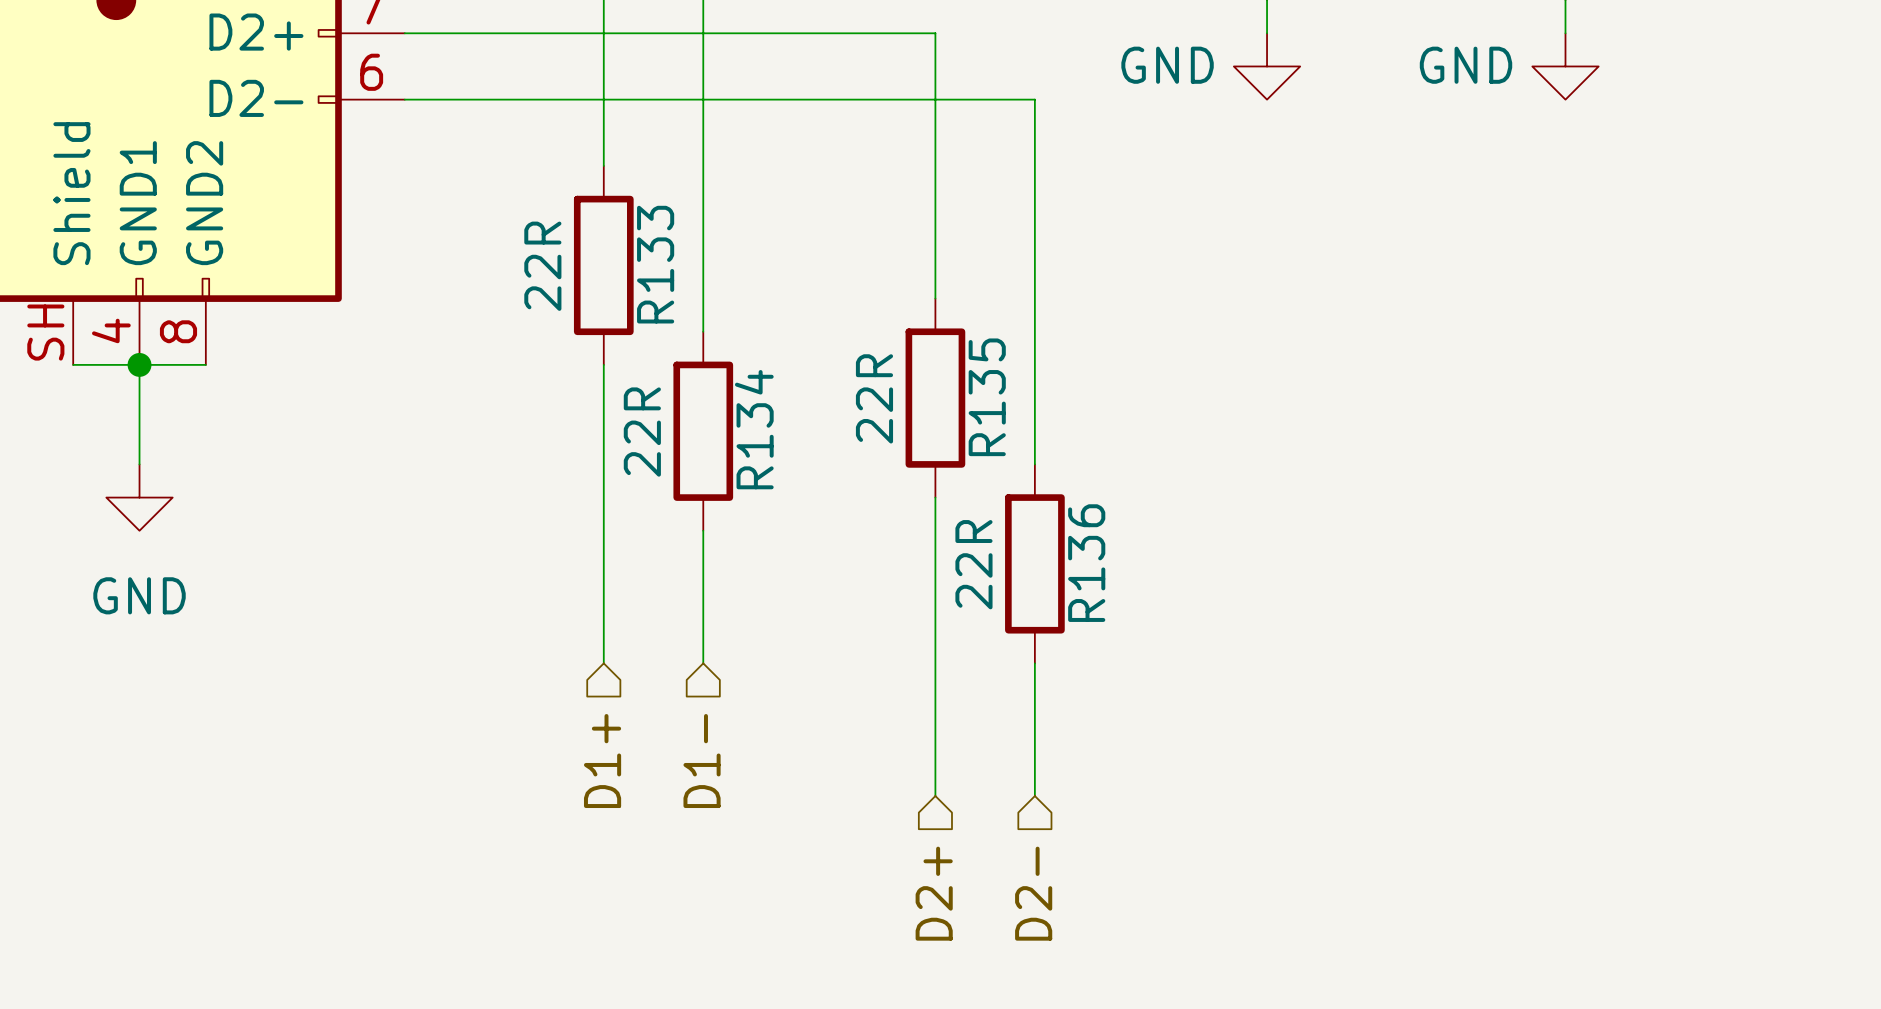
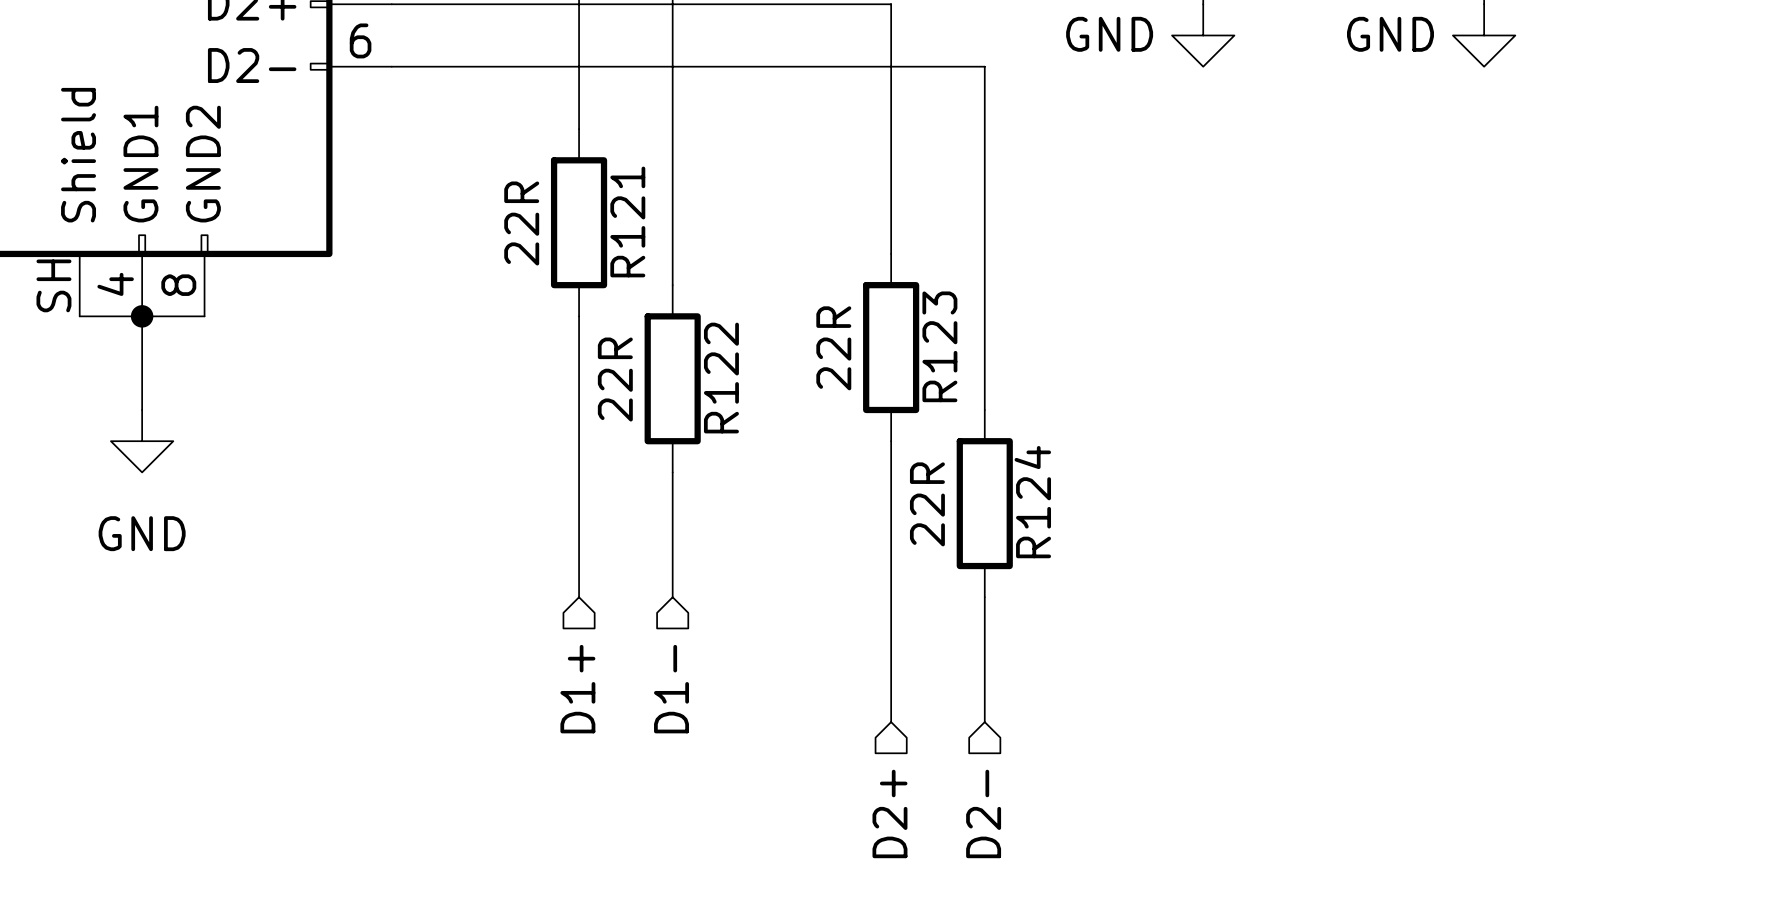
R133 name: R133 (655, 264) -> R121 (627, 221)
R135 name: R135 (987, 397) -> R123 (939, 346)
R134 name: R134 (754, 429) -> R122 (721, 378)
R136 name: R136 (1086, 563) -> R124 (1032, 502)

